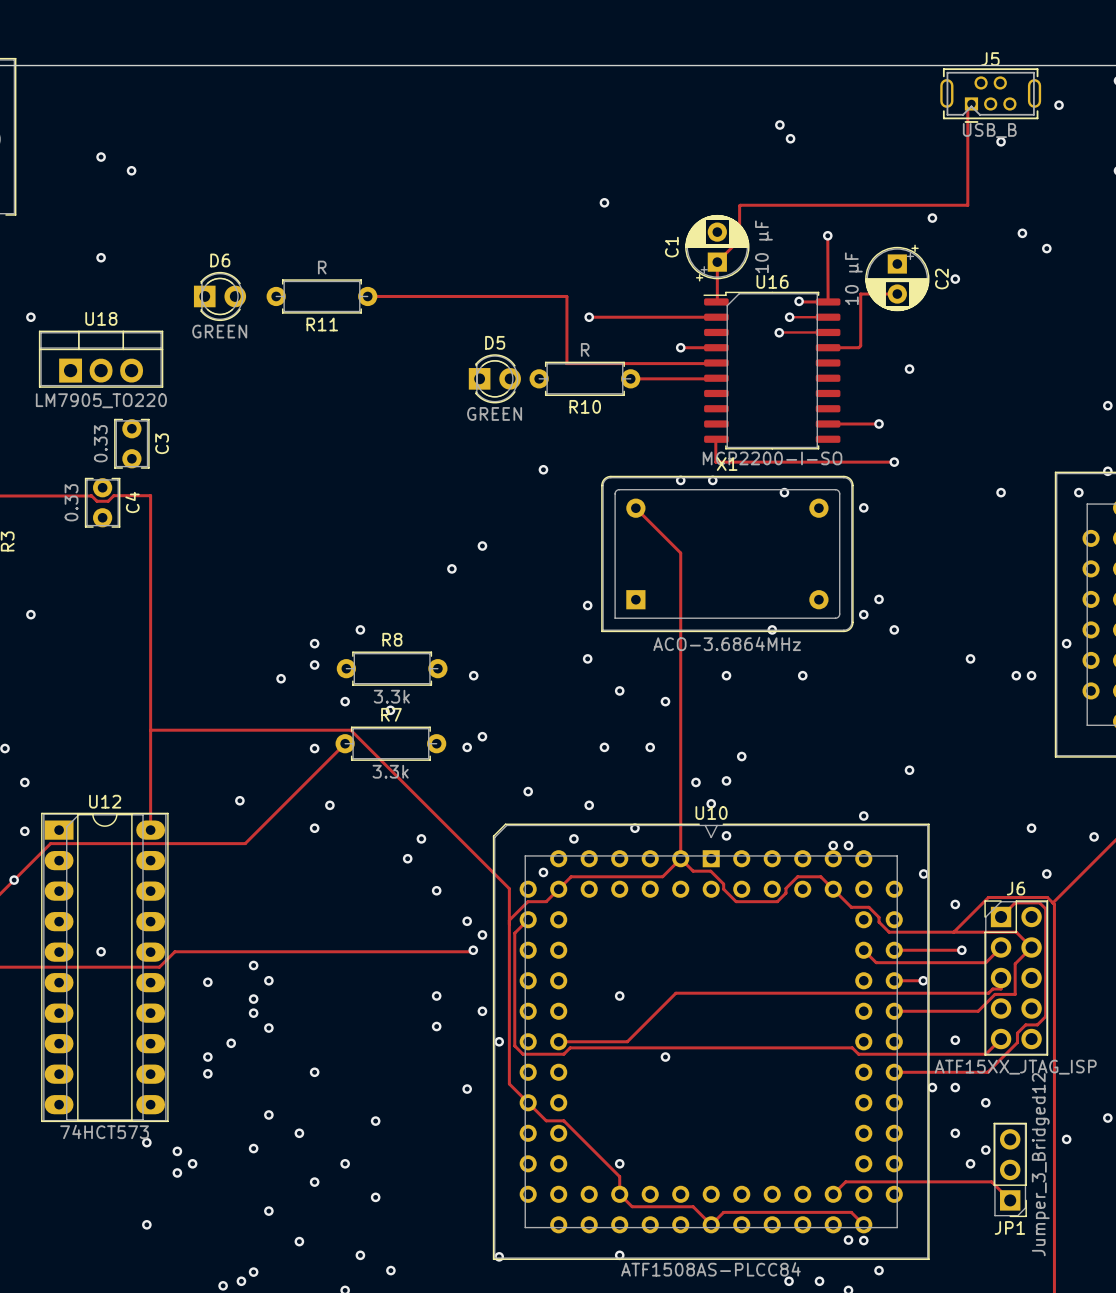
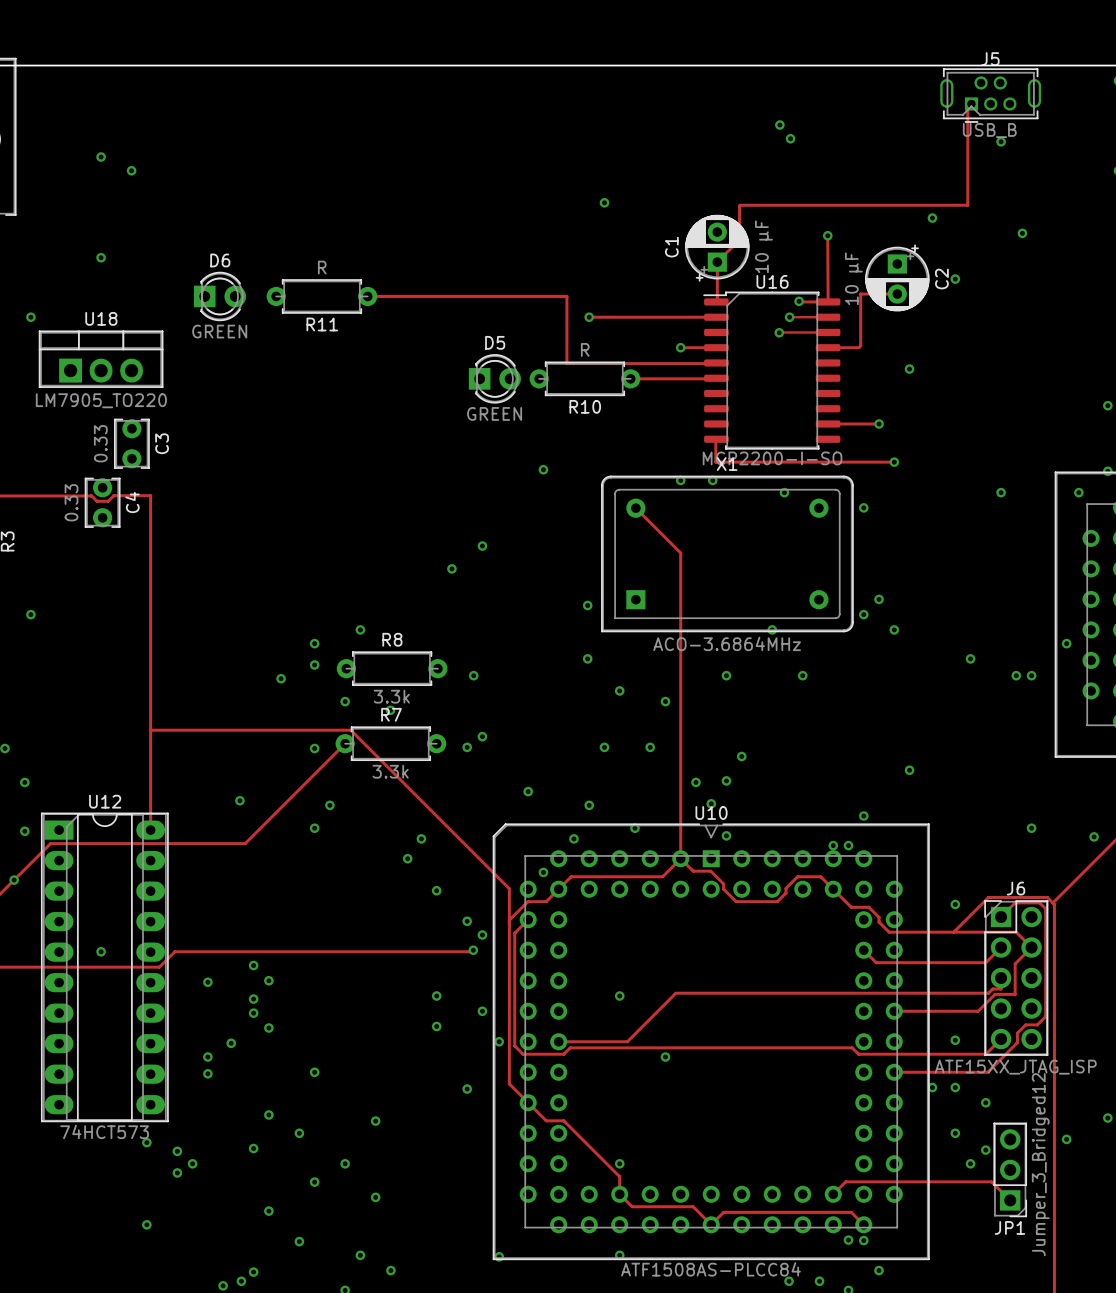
via: (1059, 105) -> none
via: (1046, 248) -> none
via: (923, 873) -> none
via: (1046, 873) -> none
track: (894, 950) (961, 950) -> none
via: (961, 950) -> none
track: (894, 980) (923, 980) -> none
via: (923, 980) -> none

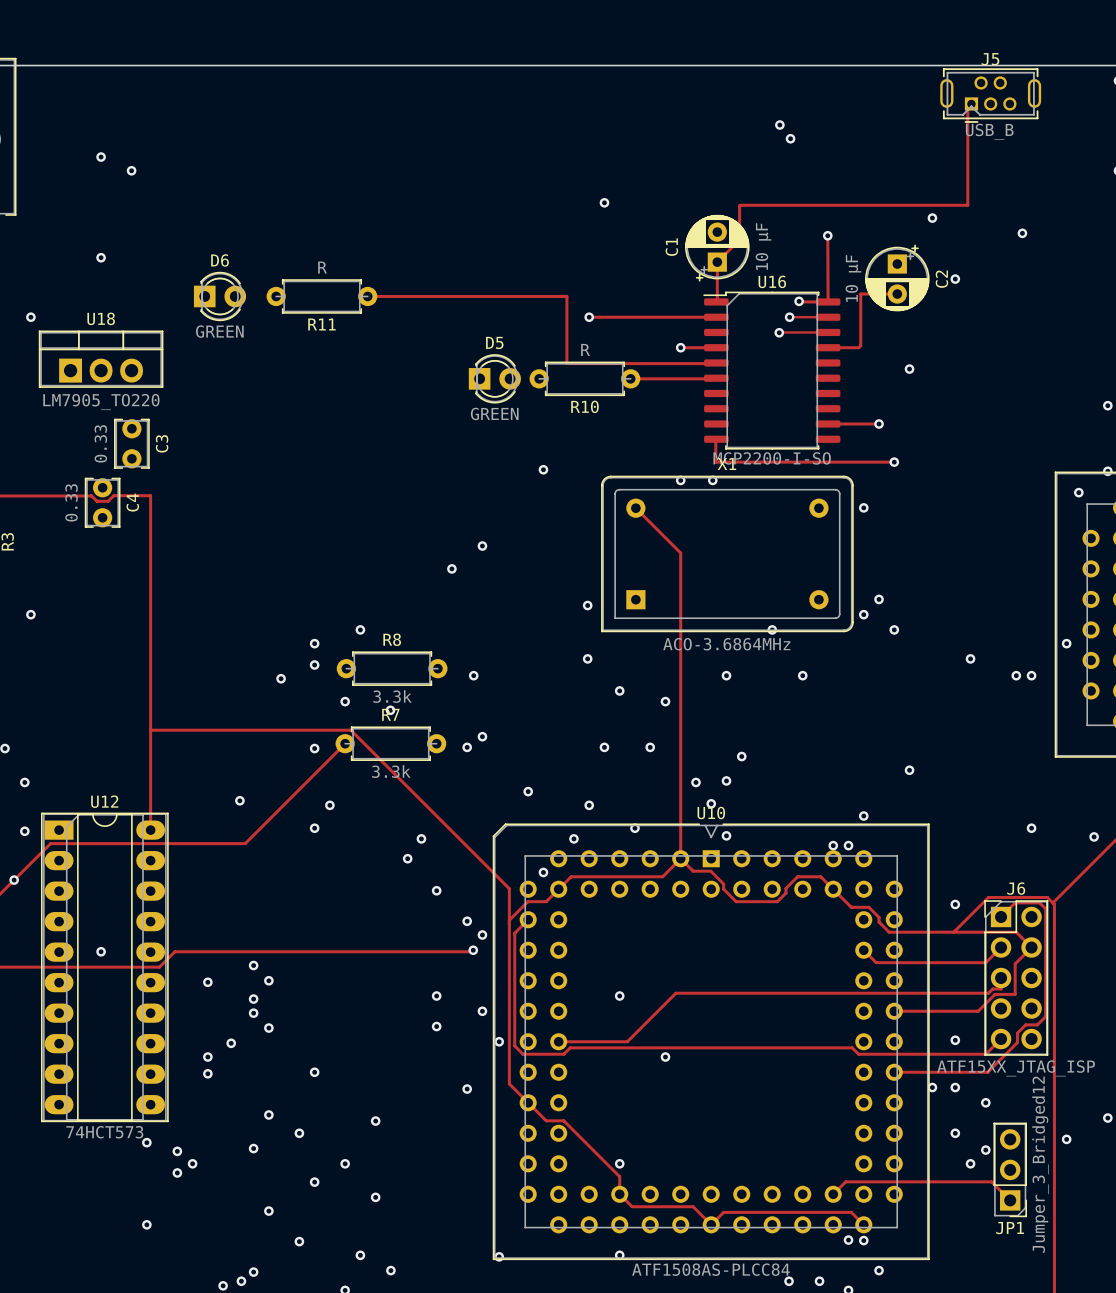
via: (1001, 141) -> none
via: (784, 492) -> none
via: (1001, 492) -> none

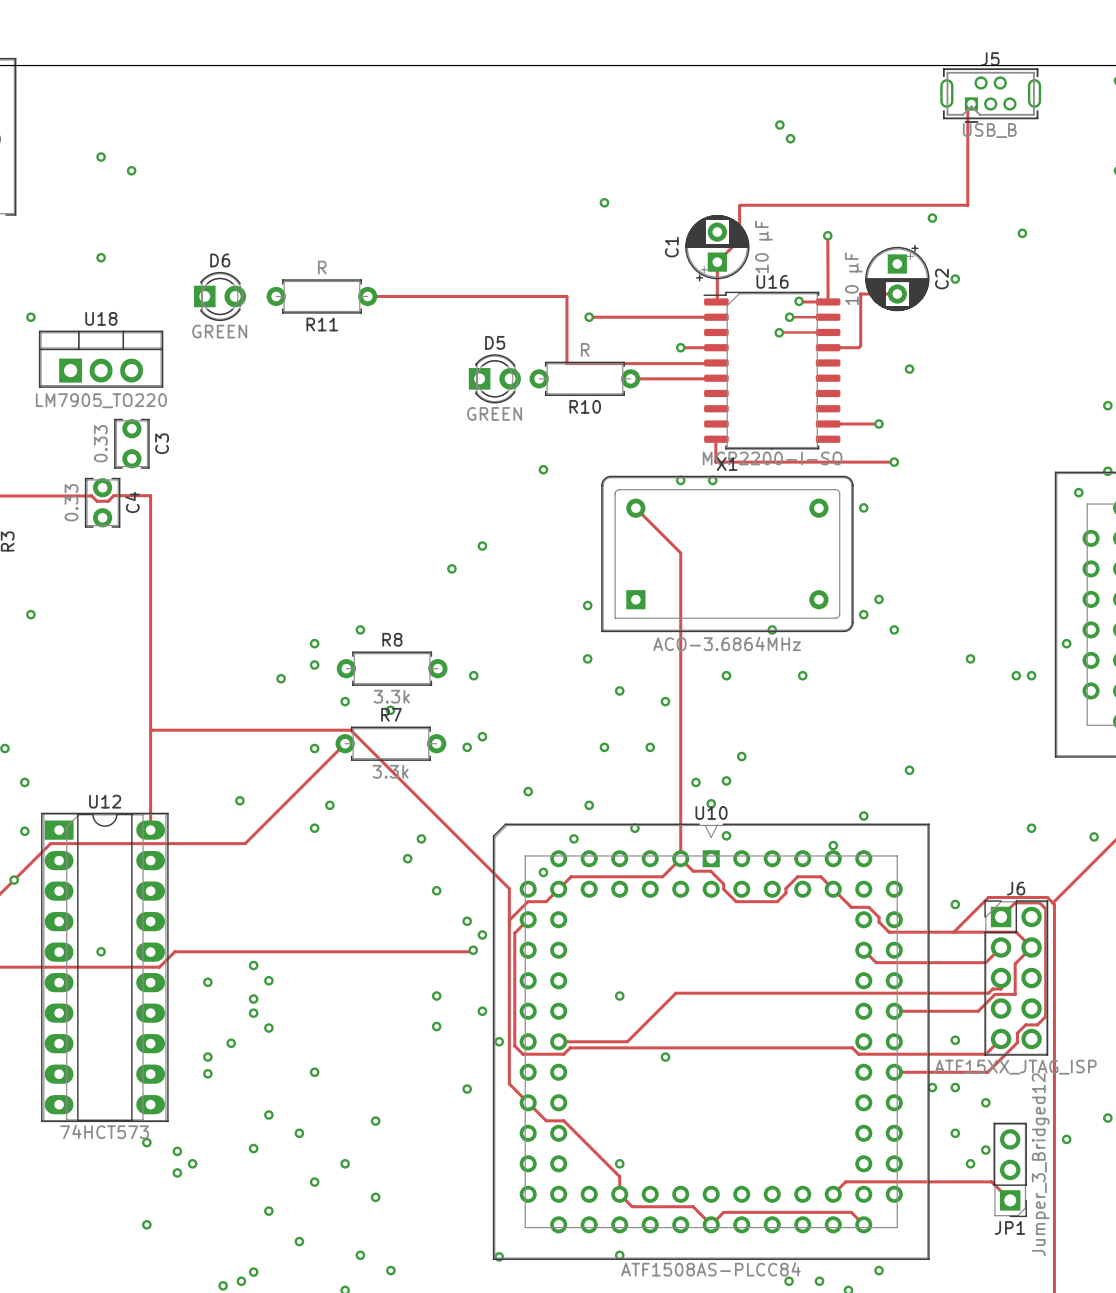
via: (848, 845) -> none
via: (848, 1240) -> none
via: (863, 1240) -> none

